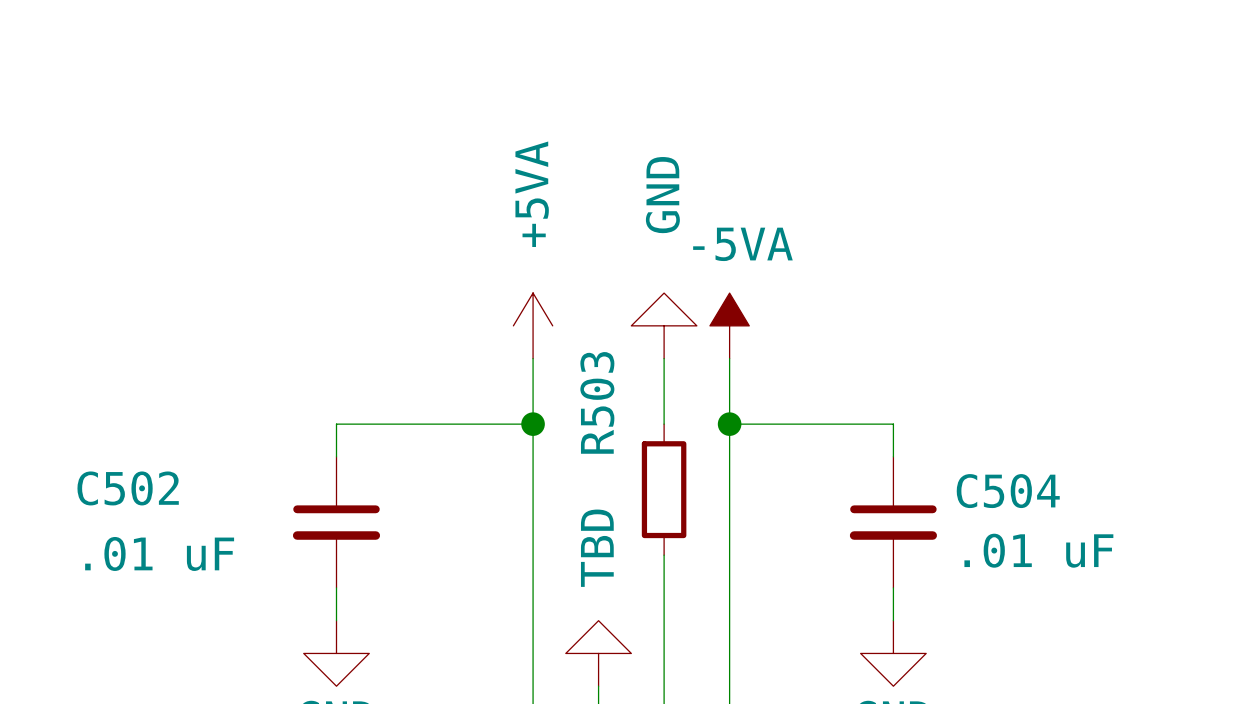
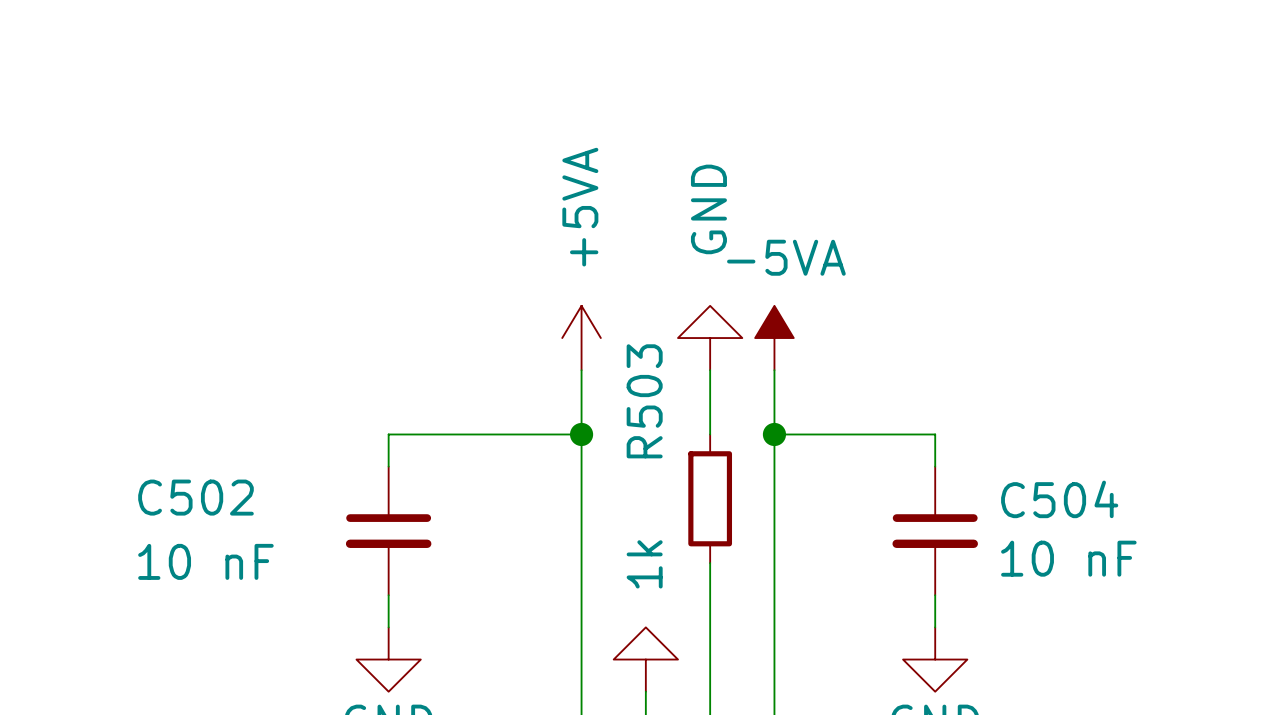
R503 value: TBD (597, 548) -> 1k (644, 564)
C504 value: .01 uF (1038, 550) -> 10 nF (1068, 558)
C502 value: .01 uF (159, 553) -> 10 nF (205, 561)

